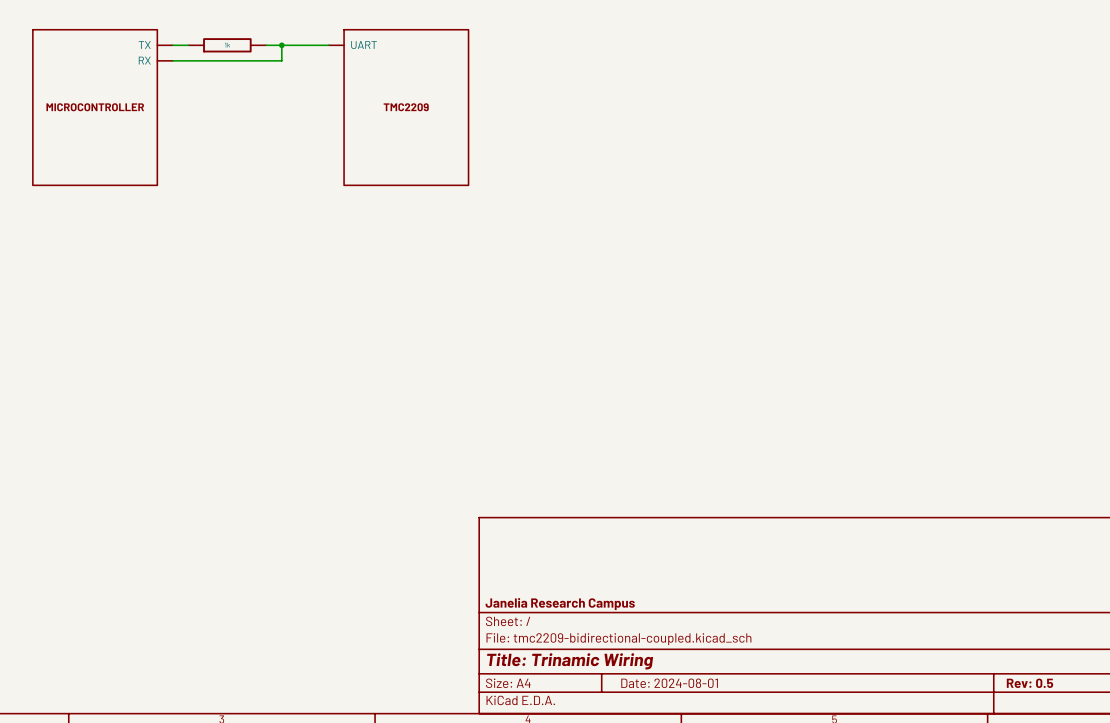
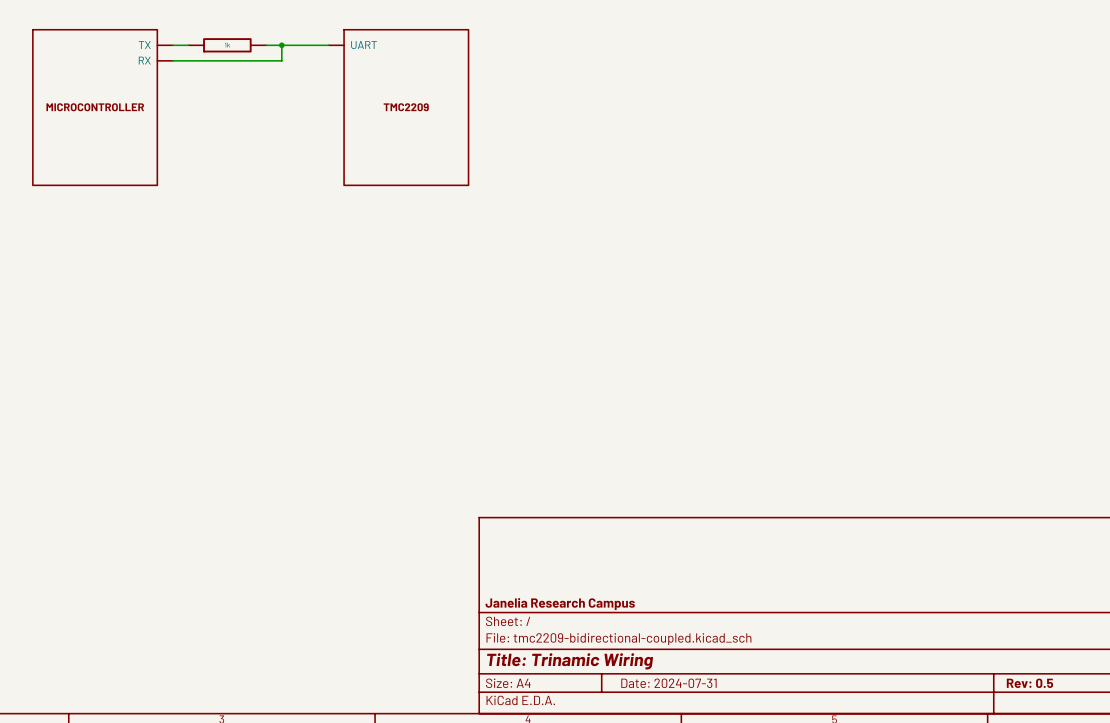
title block: Date: 2024-08-01 (669, 683) -> Date: 2024-07-31 (668, 683)

